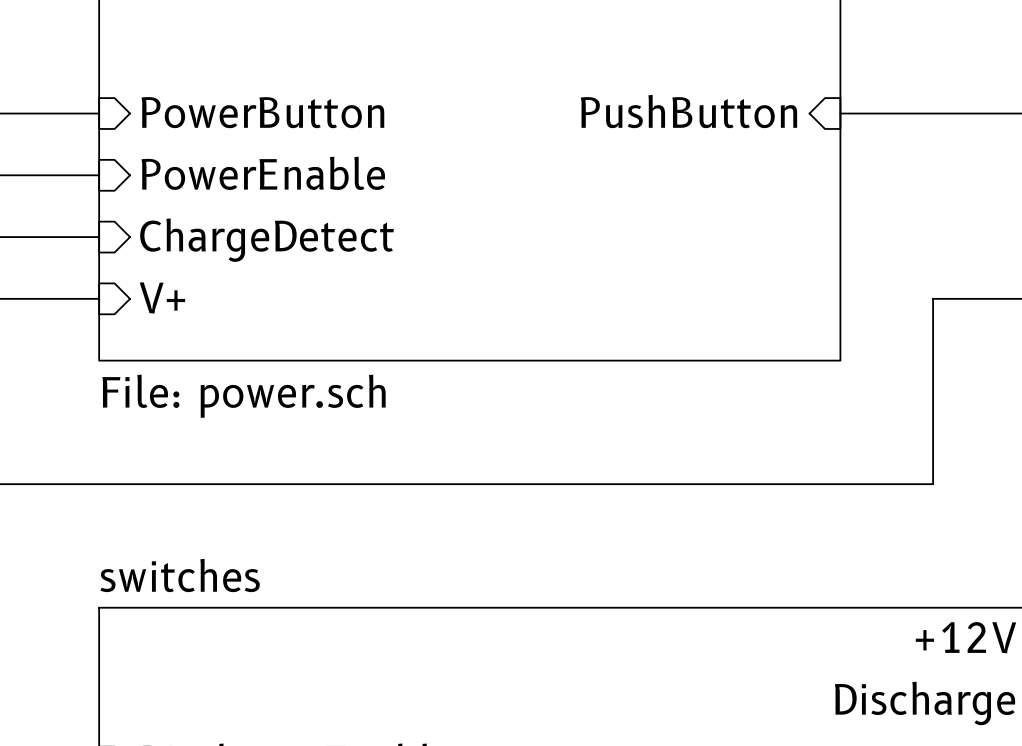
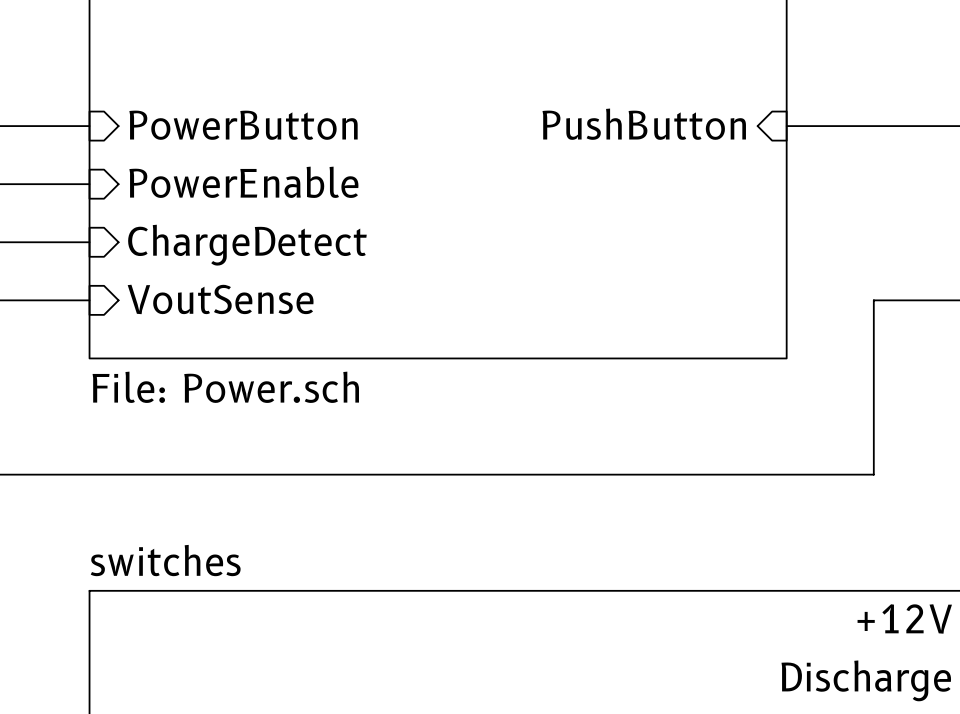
sheet pin: V+ (162, 297) -> VoutSense (220, 299)
sheet value: File: power.sch (244, 396) -> File: Power.sch (225, 387)

